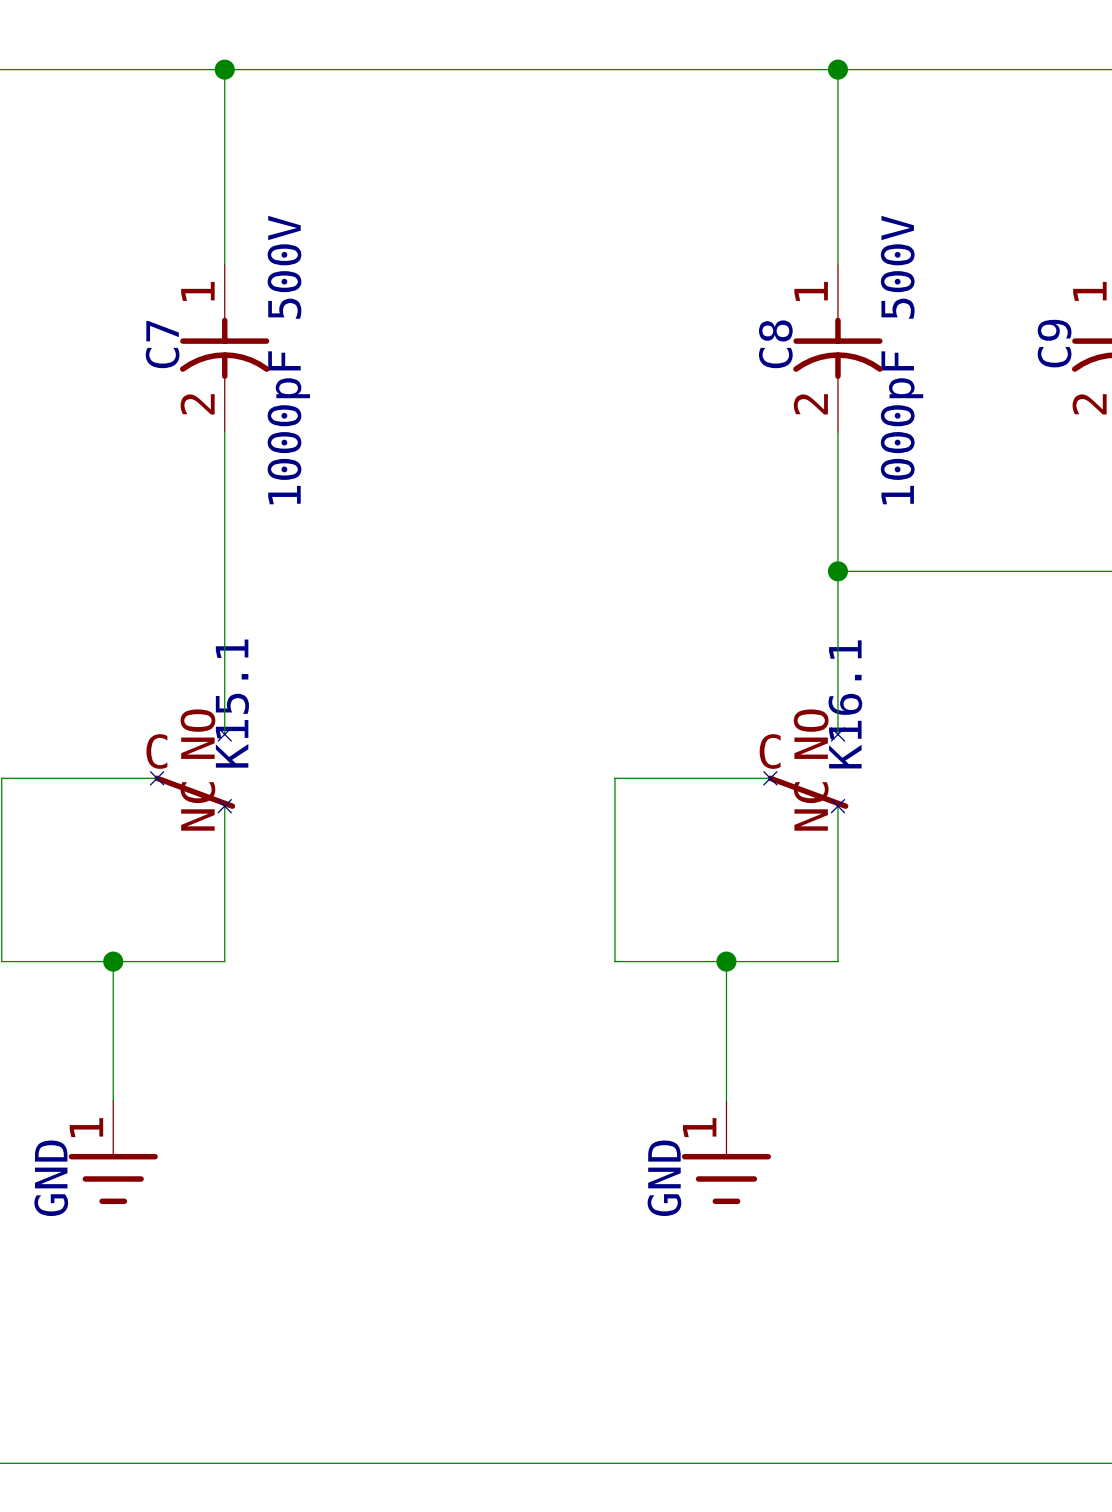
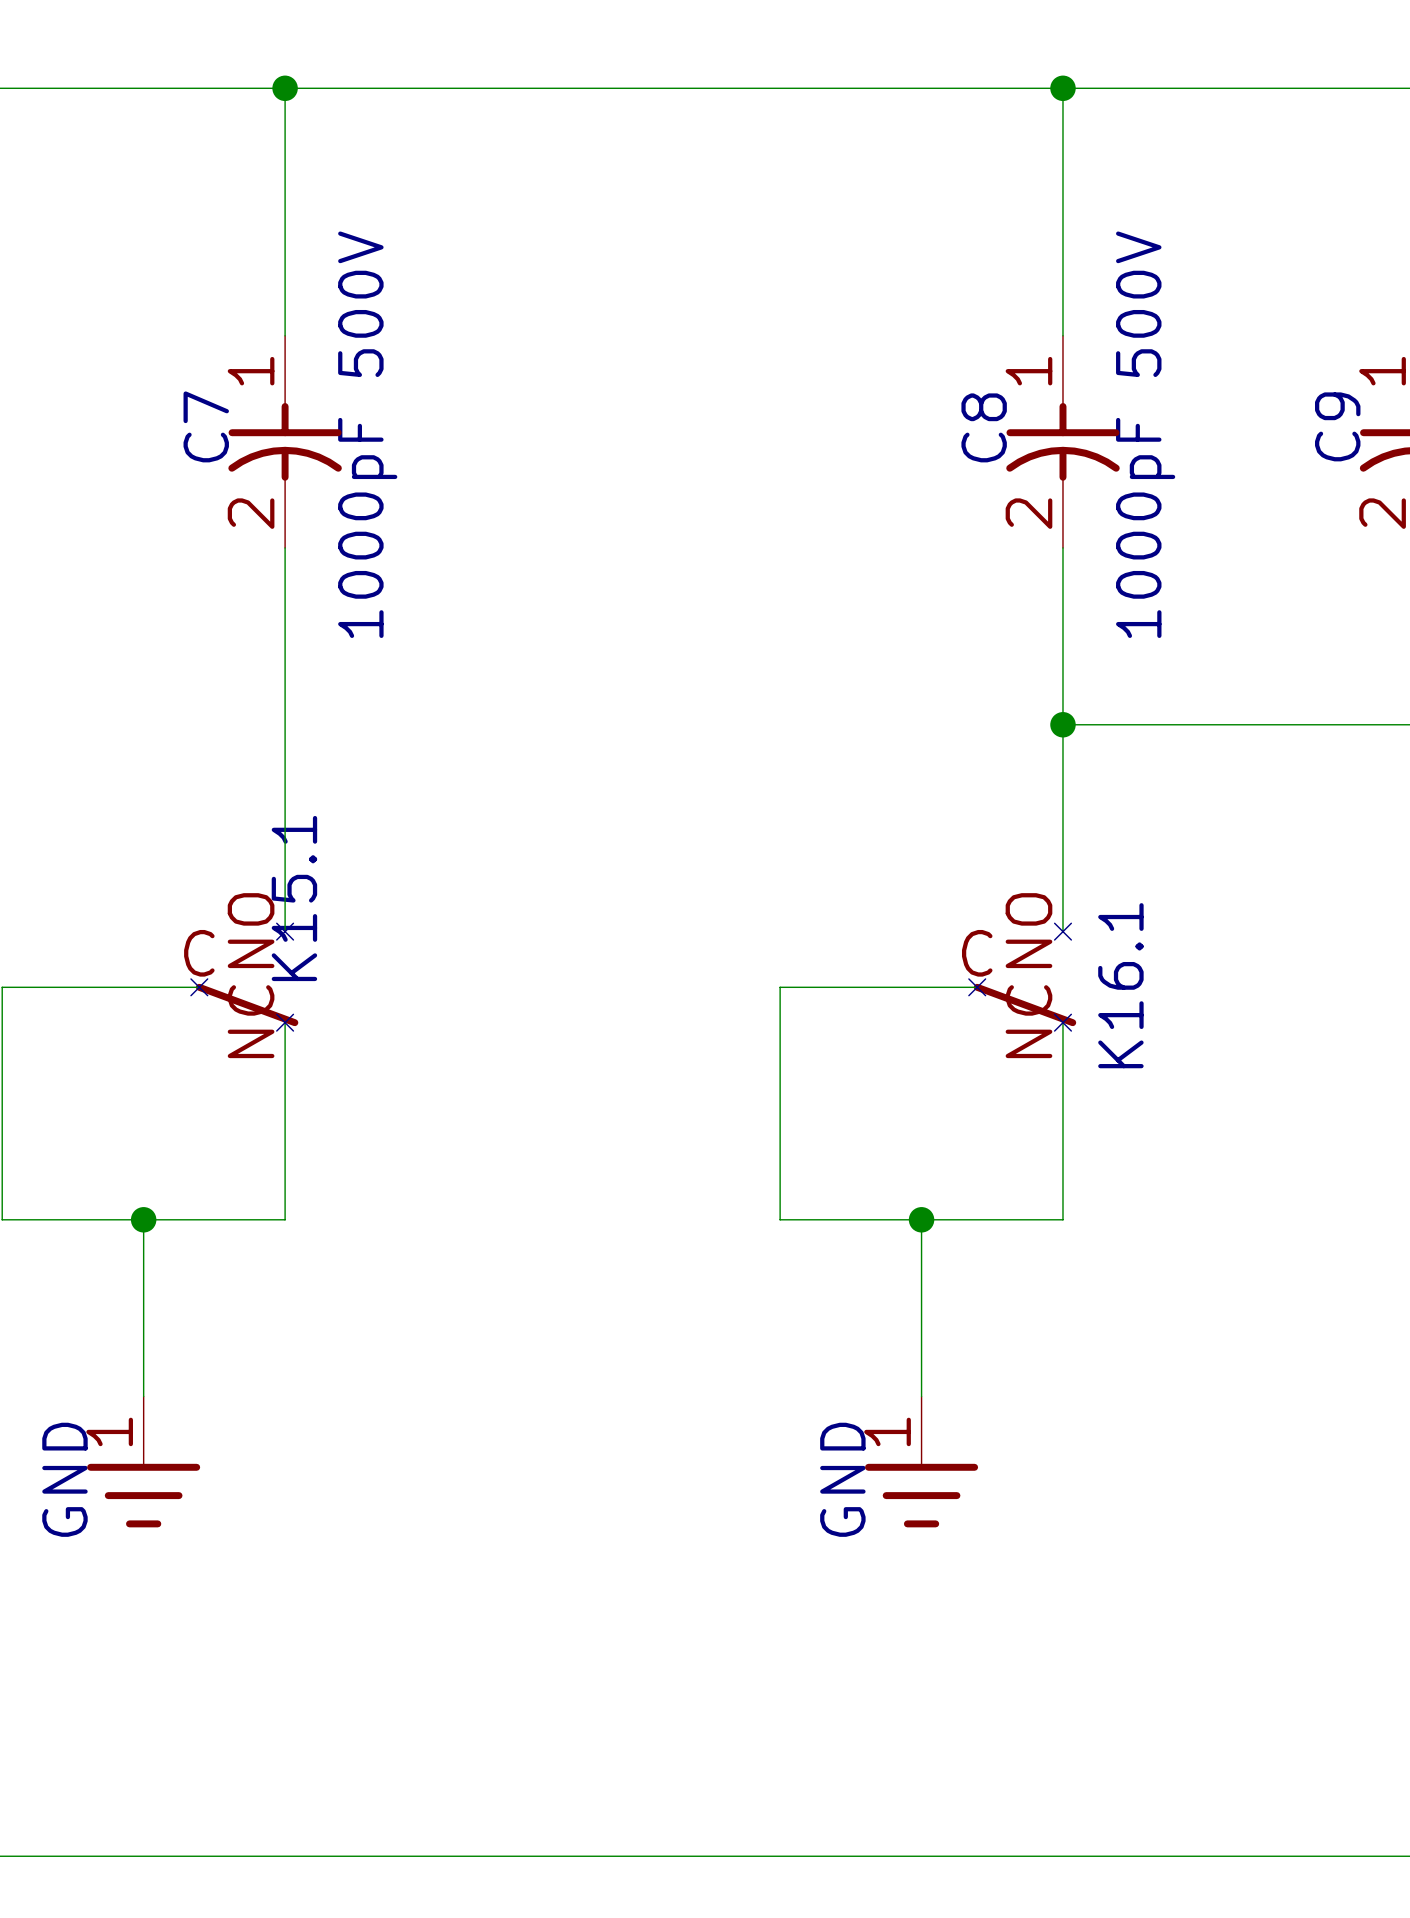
text position: K16.1 (845, 704) -> K16.1 (1120, 985)

